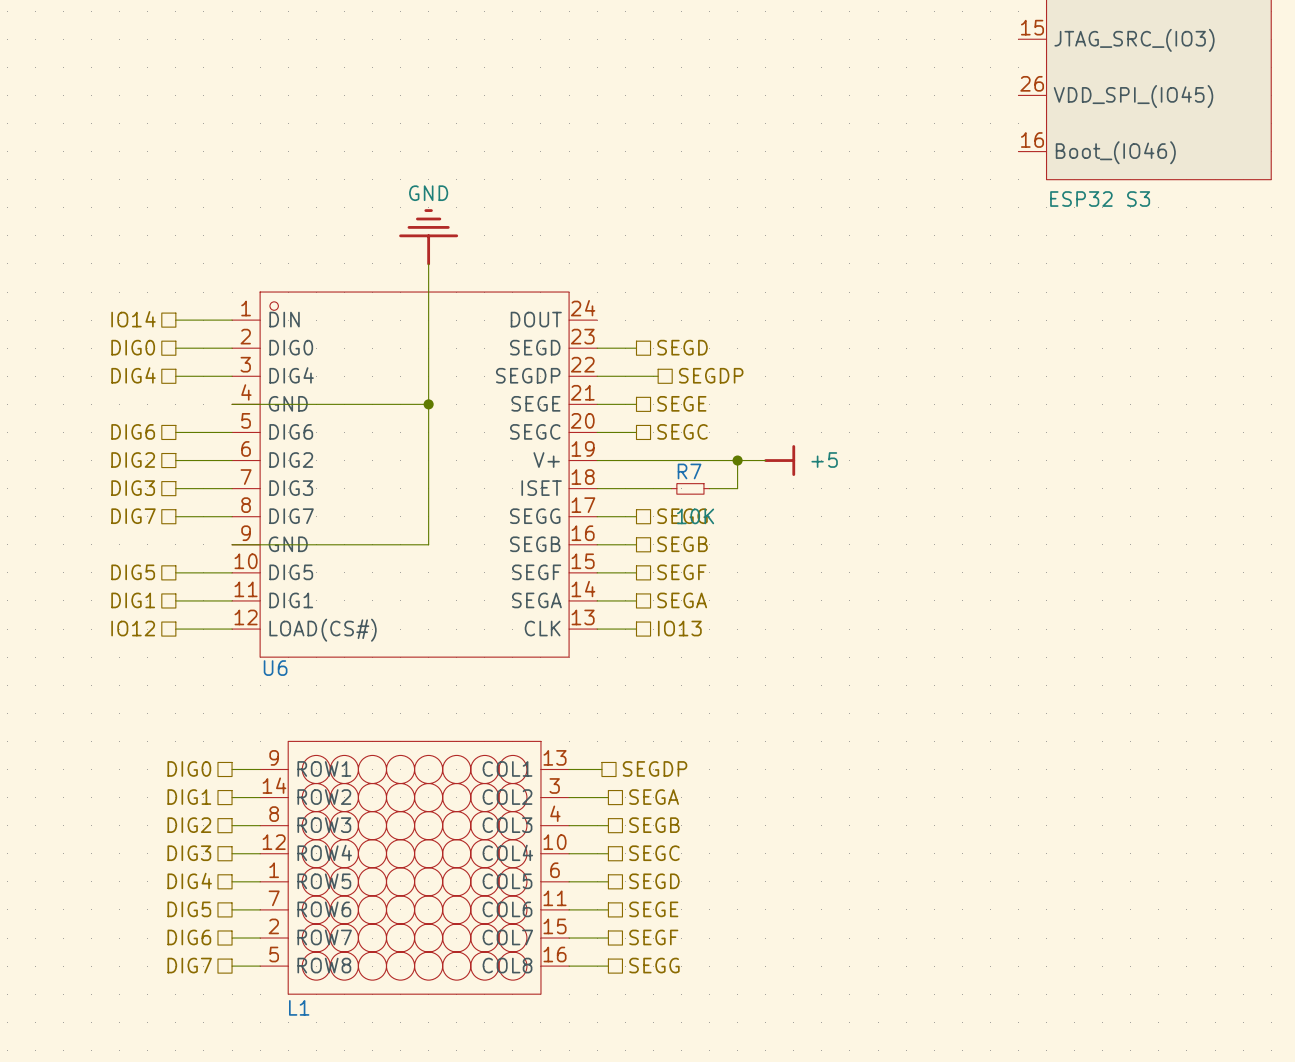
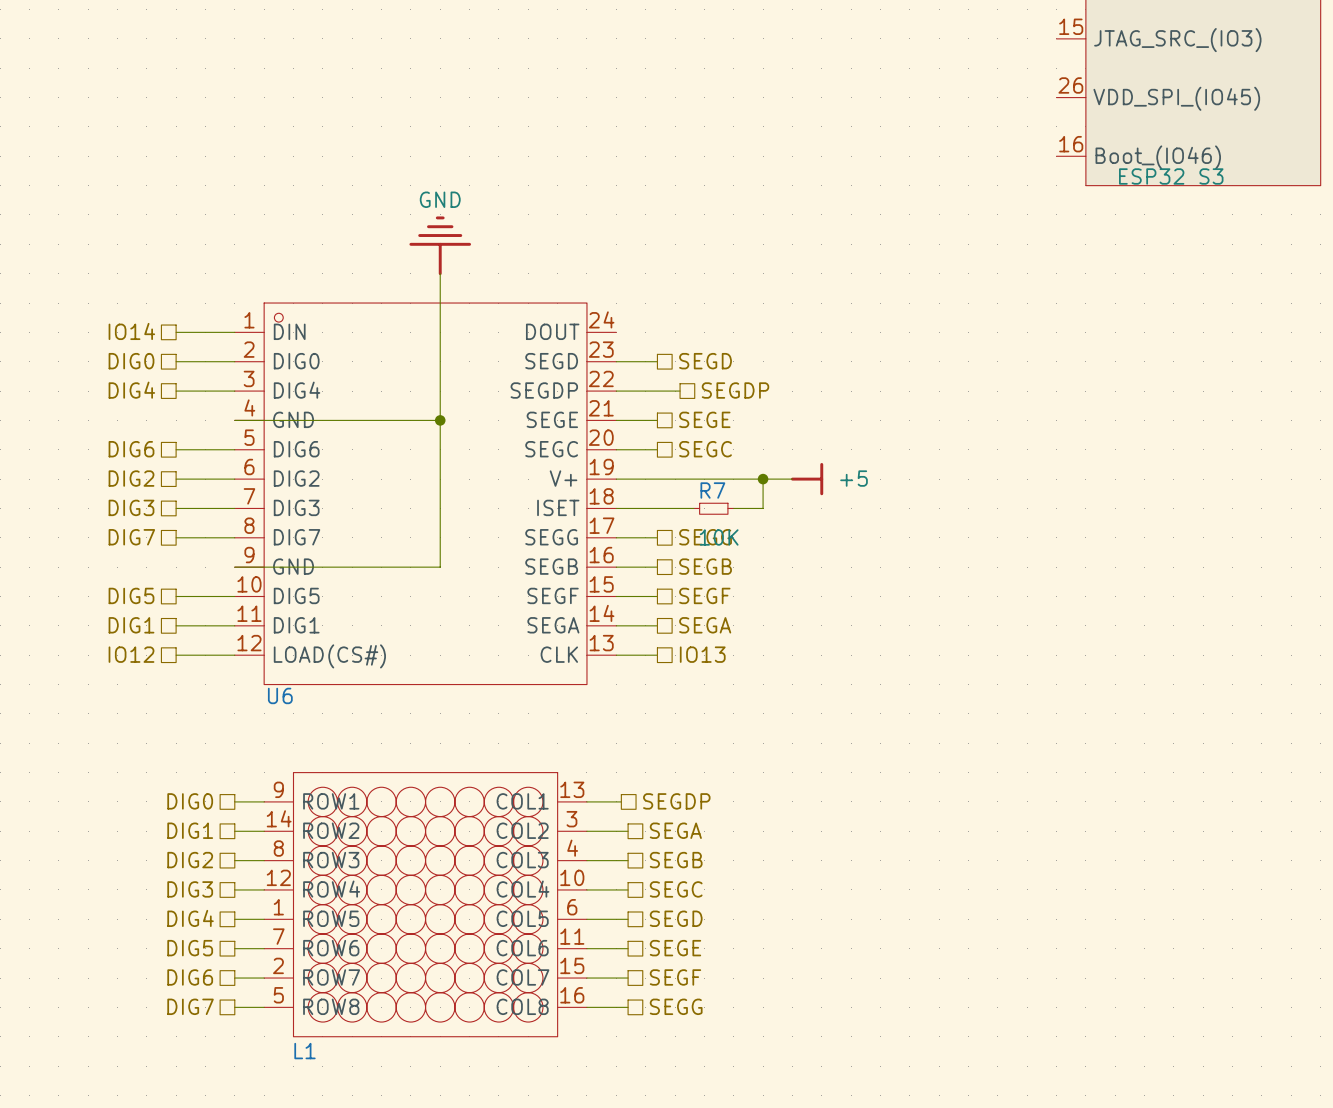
part value position: ESP32 S3 (1100, 199) -> ESP32 S3 (1171, 176)

